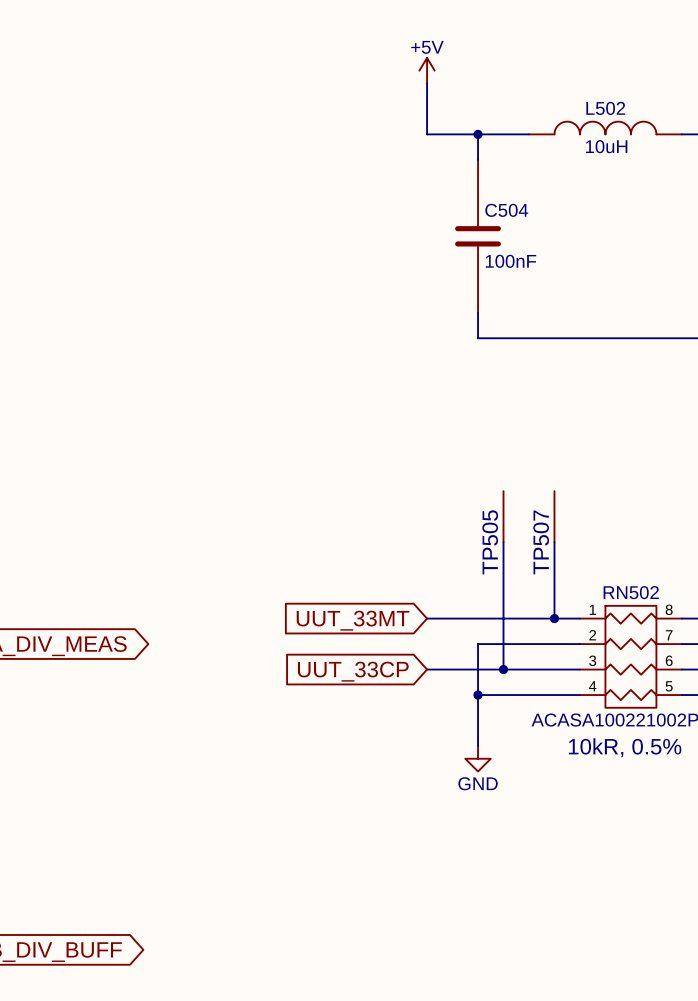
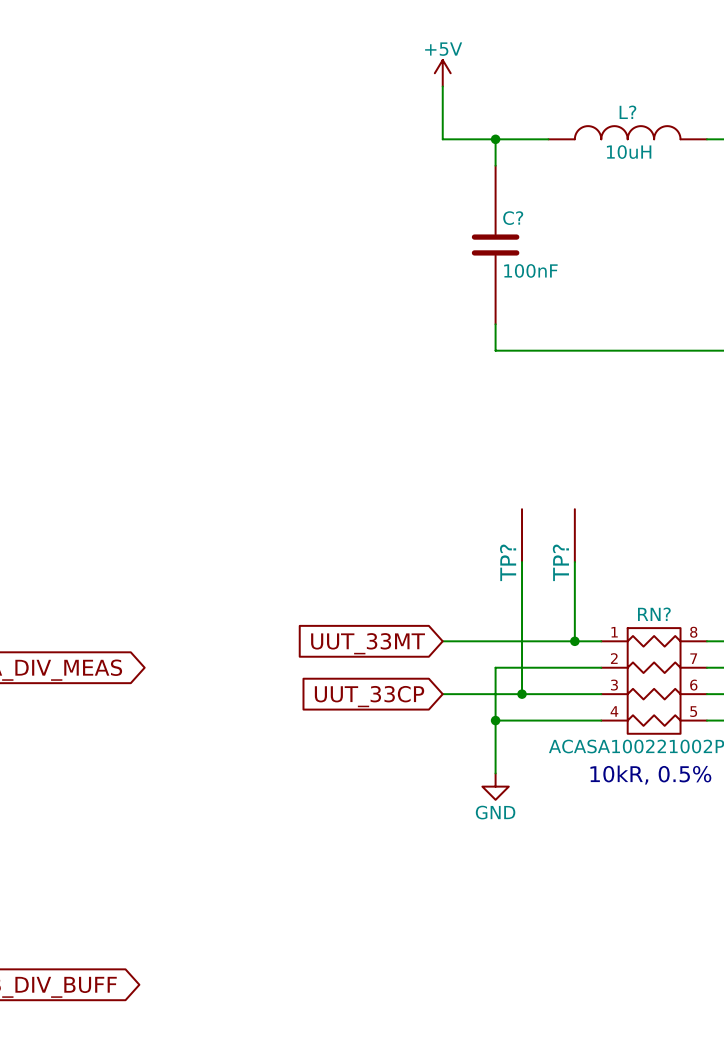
L502 name: L502 (605, 108) -> L? (627, 112)
C504 name: C504 (506, 210) -> C? (513, 218)
TP505 name: TP505 (490, 542) -> TP? (508, 562)
TP507 name: TP507 (541, 542) -> TP? (560, 562)
RN502 name: RN502 (631, 592) -> RN? (654, 614)

